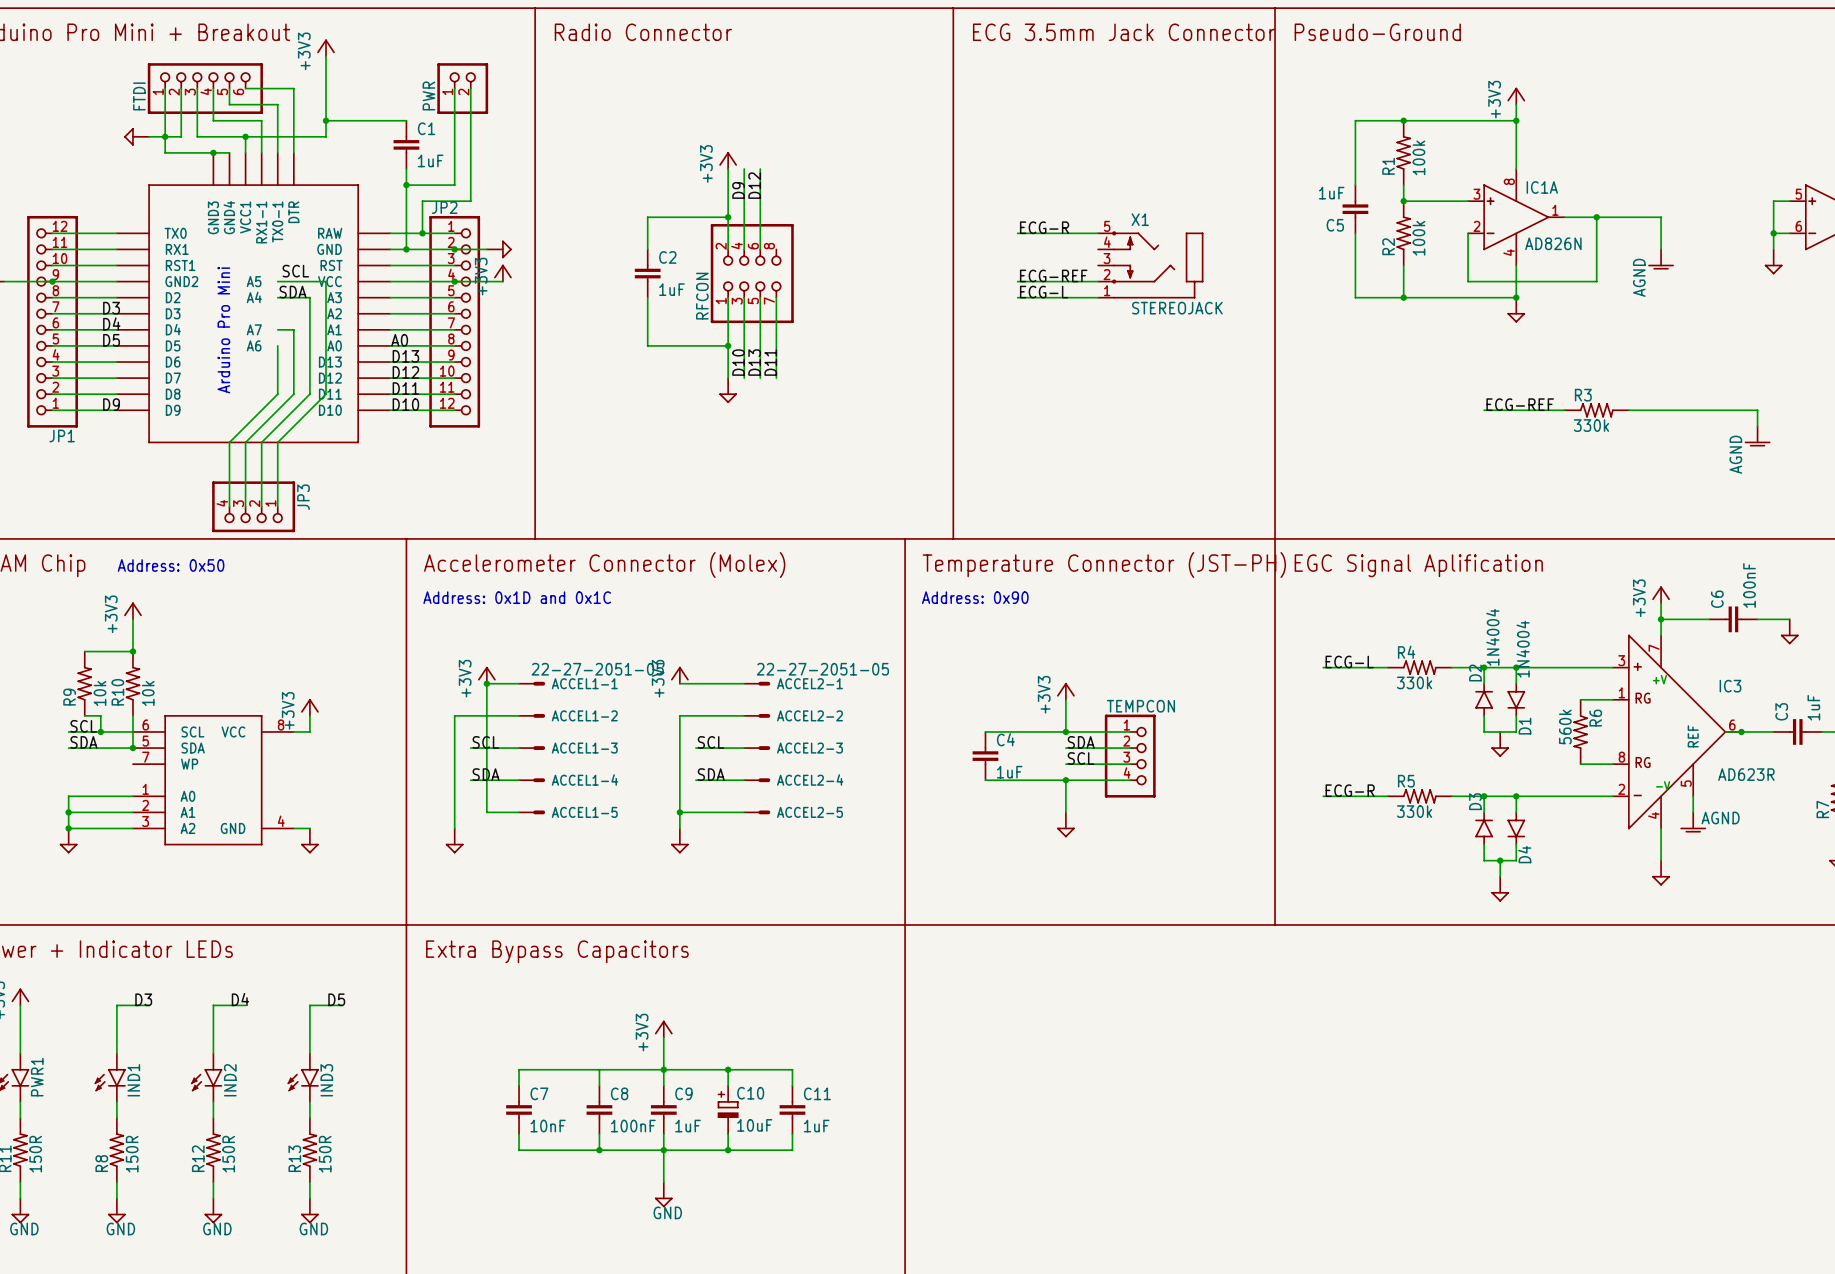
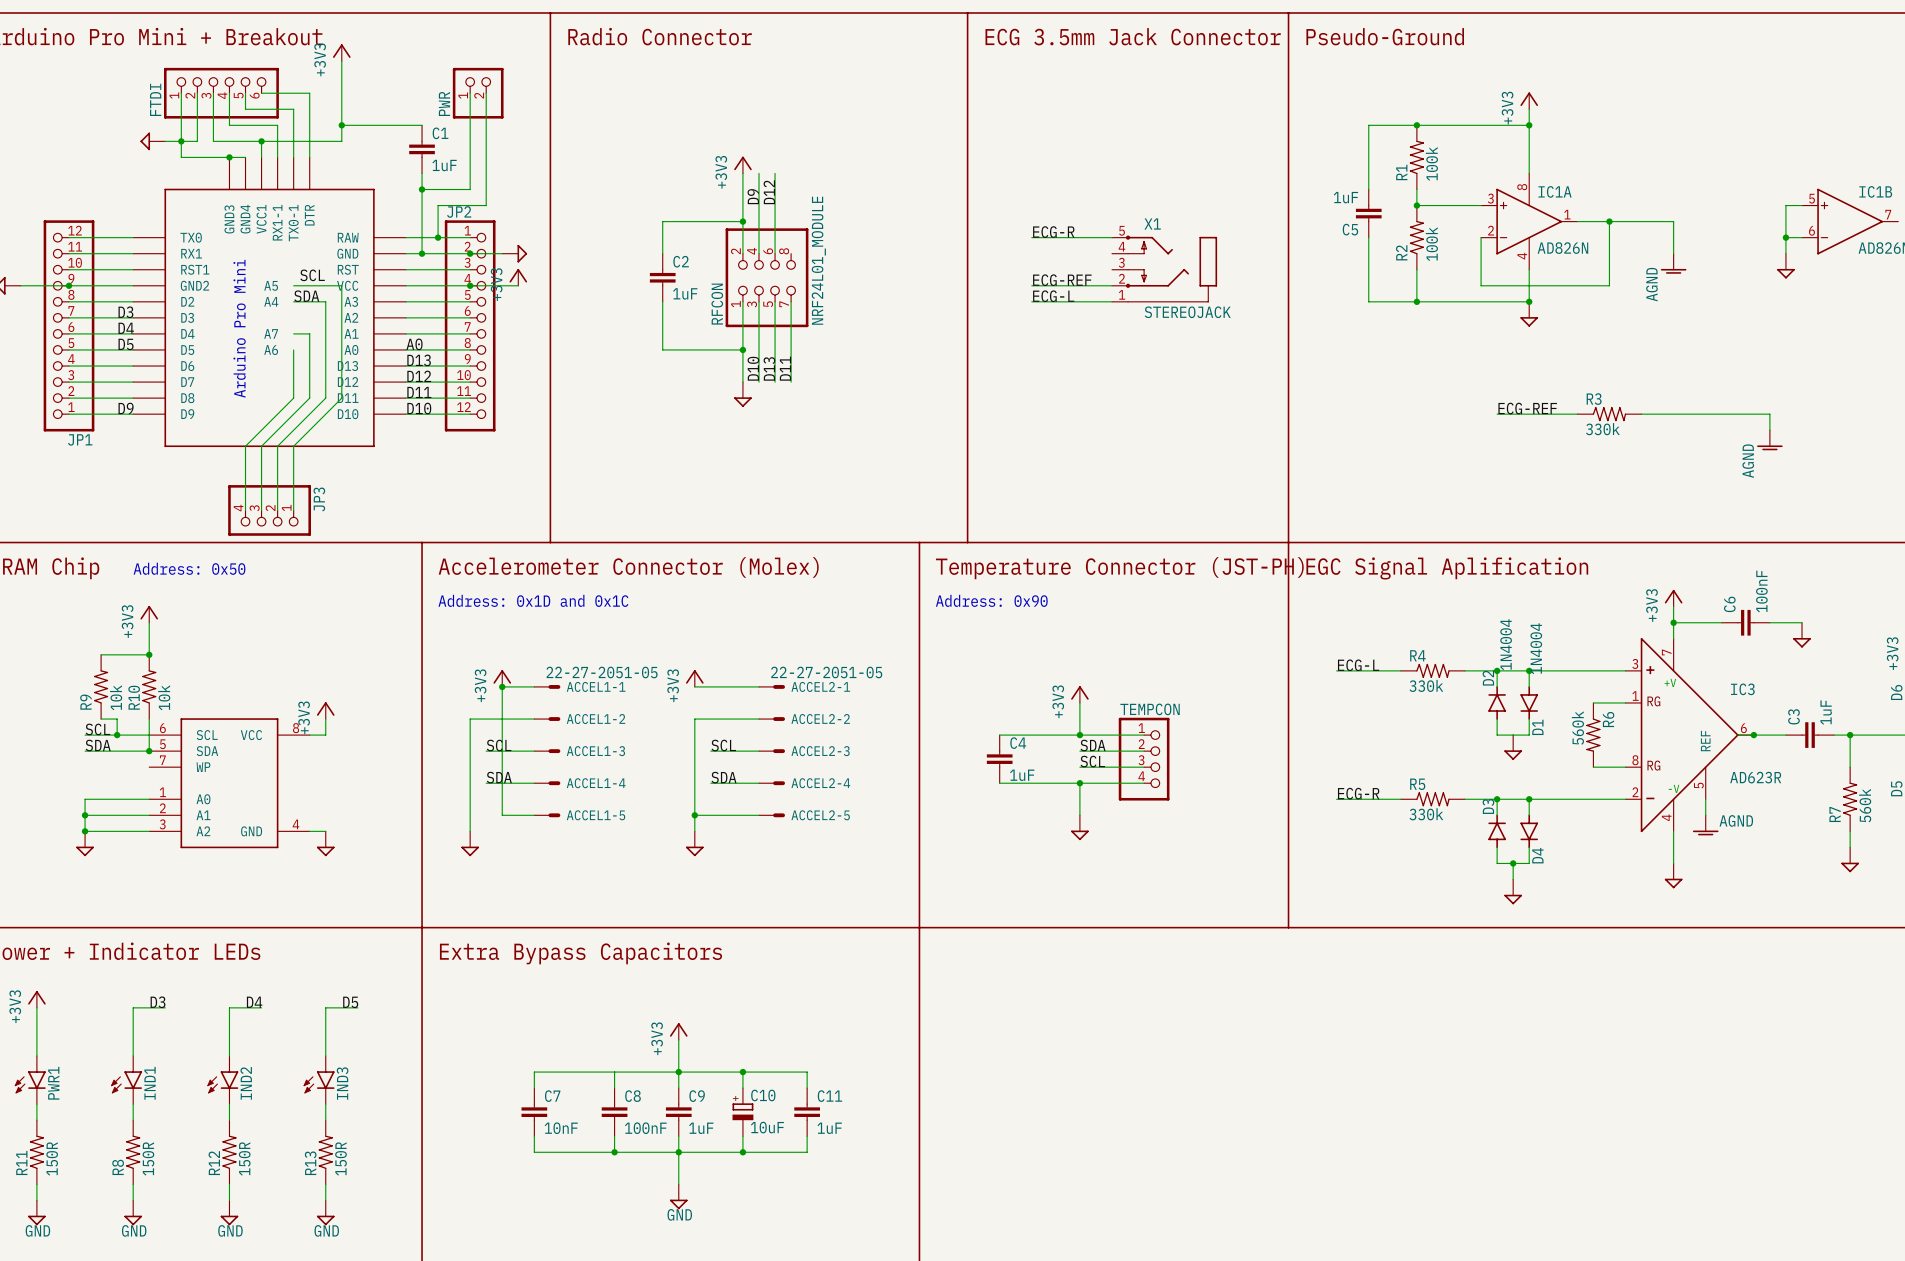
RFCON value: none -> NRF24L01_MODULE (818, 260)

